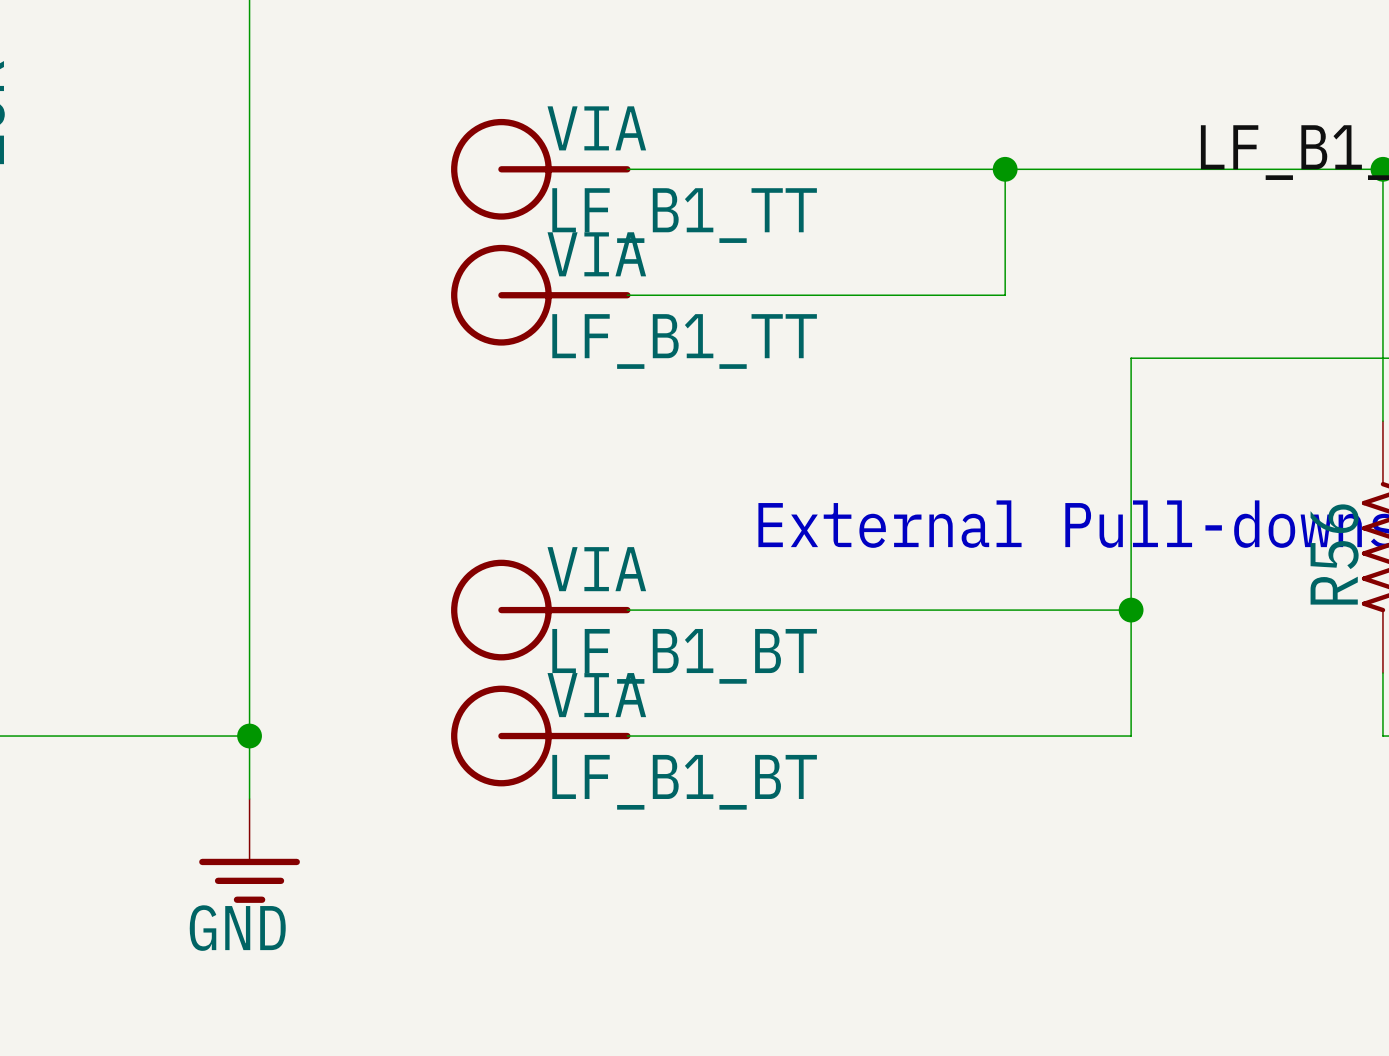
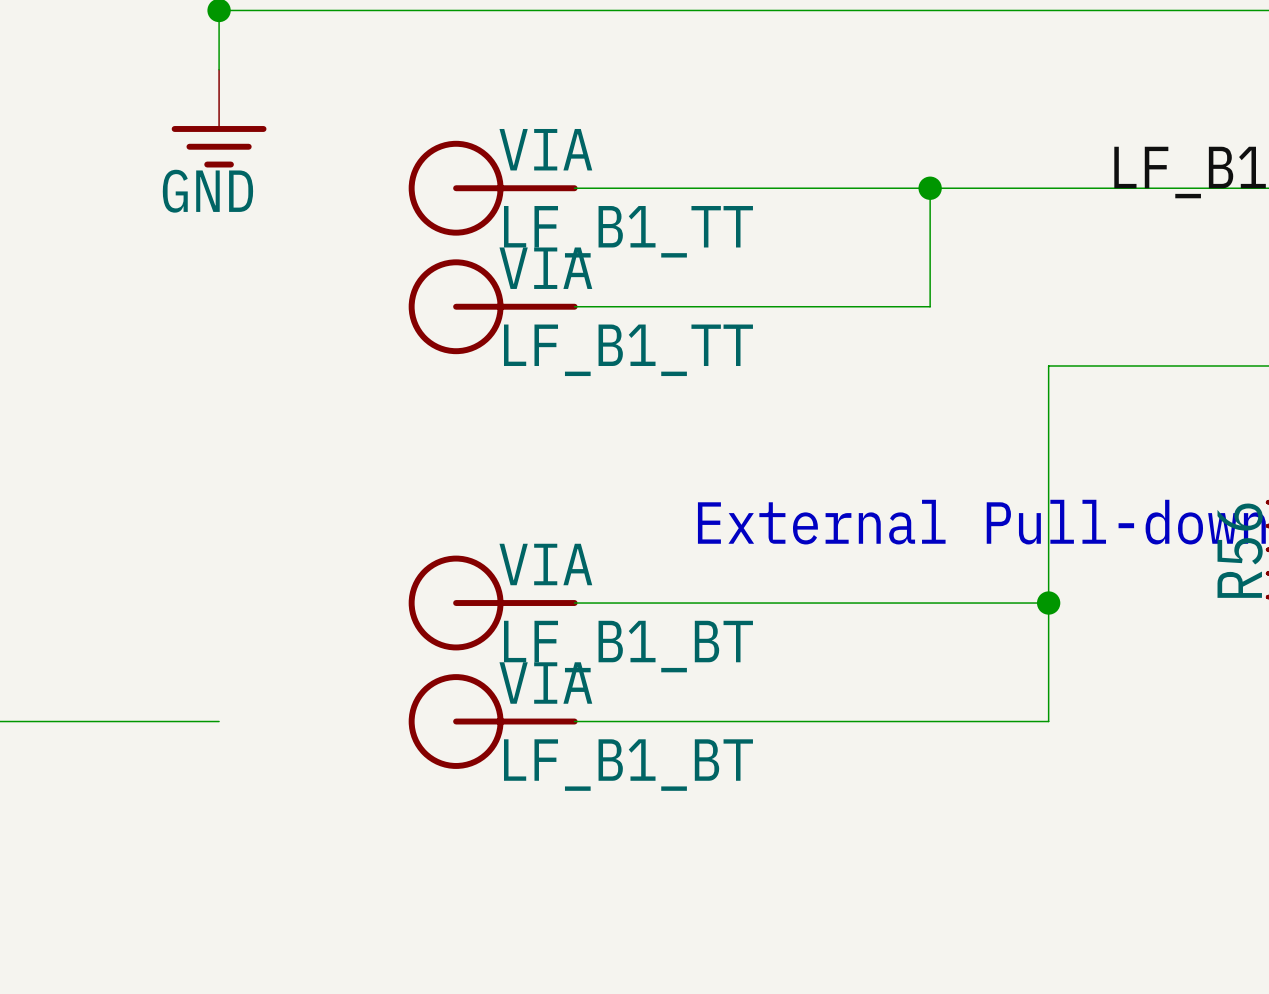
wire: (249, 43) (249, 798) -> none
power symbol: none -> GND (219, 118)
junction: (249, 736) -> none
power symbol: GND (249, 850) -> none

